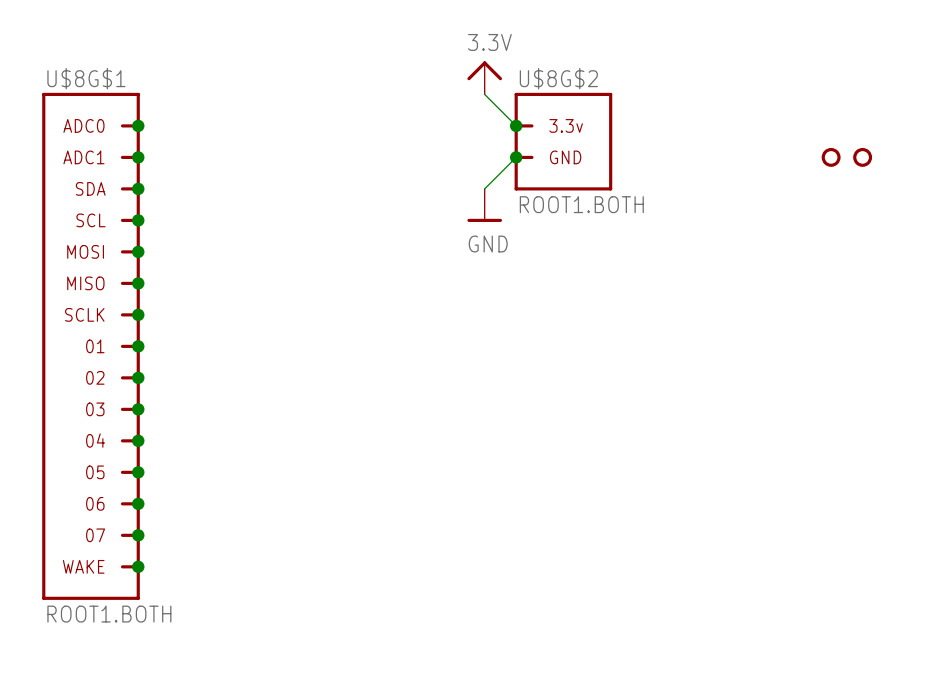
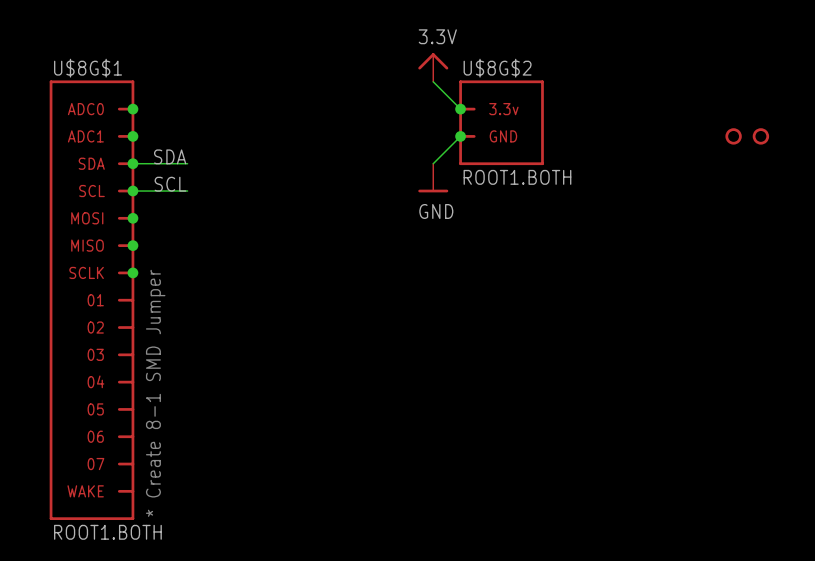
label: none -> SDA (170, 156)
wire: none -> (132, 163) (187, 163)
label: none -> SCL (170, 184)
wire: none -> (132, 191) (187, 191)
junction: (138, 346) -> none
junction: (138, 377) -> none
junction: (138, 409) -> none
junction: (138, 440) -> none
text: none -> * Create 8-1 SMD Jumper (155, 393)
junction: (138, 472) -> none
junction: (138, 503) -> none
junction: (138, 535) -> none
junction: (138, 566) -> none

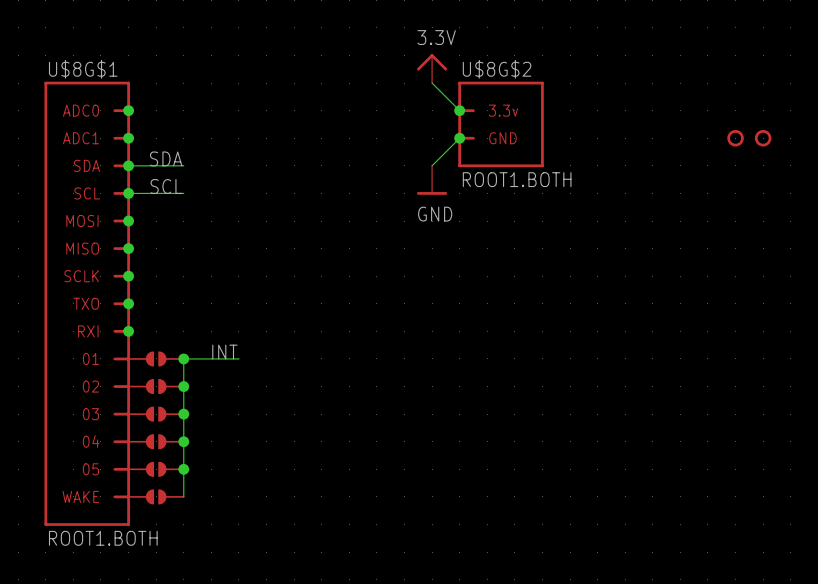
U$8G$1 text: 01 (95, 300) -> TXO (86, 303)
junction: none -> (128, 303)
U$8G$1 text: 02 (95, 327) -> RXI (88, 331)
junction: none -> (128, 331)
label: none -> INT (224, 352)
U$8G$1 text: 03 (95, 354) -> 01 (90, 358)
part: none -> (156, 358)
junction: none -> (183, 358)
wire: none -> (238, 358) (183, 358) (183, 496)
U$8G$1 text: 04 (95, 381) -> 02 (90, 386)
part: none -> (156, 386)
junction: none -> (183, 386)
text: * Create 8-1 SMD Jumper (155, 393) -> none
U$8G$1 text: 05 (95, 409) -> 03 (90, 414)
part: none -> (156, 414)
junction: none -> (183, 414)
U$8G$1 text: 06 (95, 436) -> 04 (91, 441)
part: none -> (156, 441)
junction: none -> (183, 441)
U$8G$1 text: 07 (95, 464) -> 05 (90, 469)
part: none -> (156, 469)
junction: none -> (183, 469)
part: none -> (156, 496)

